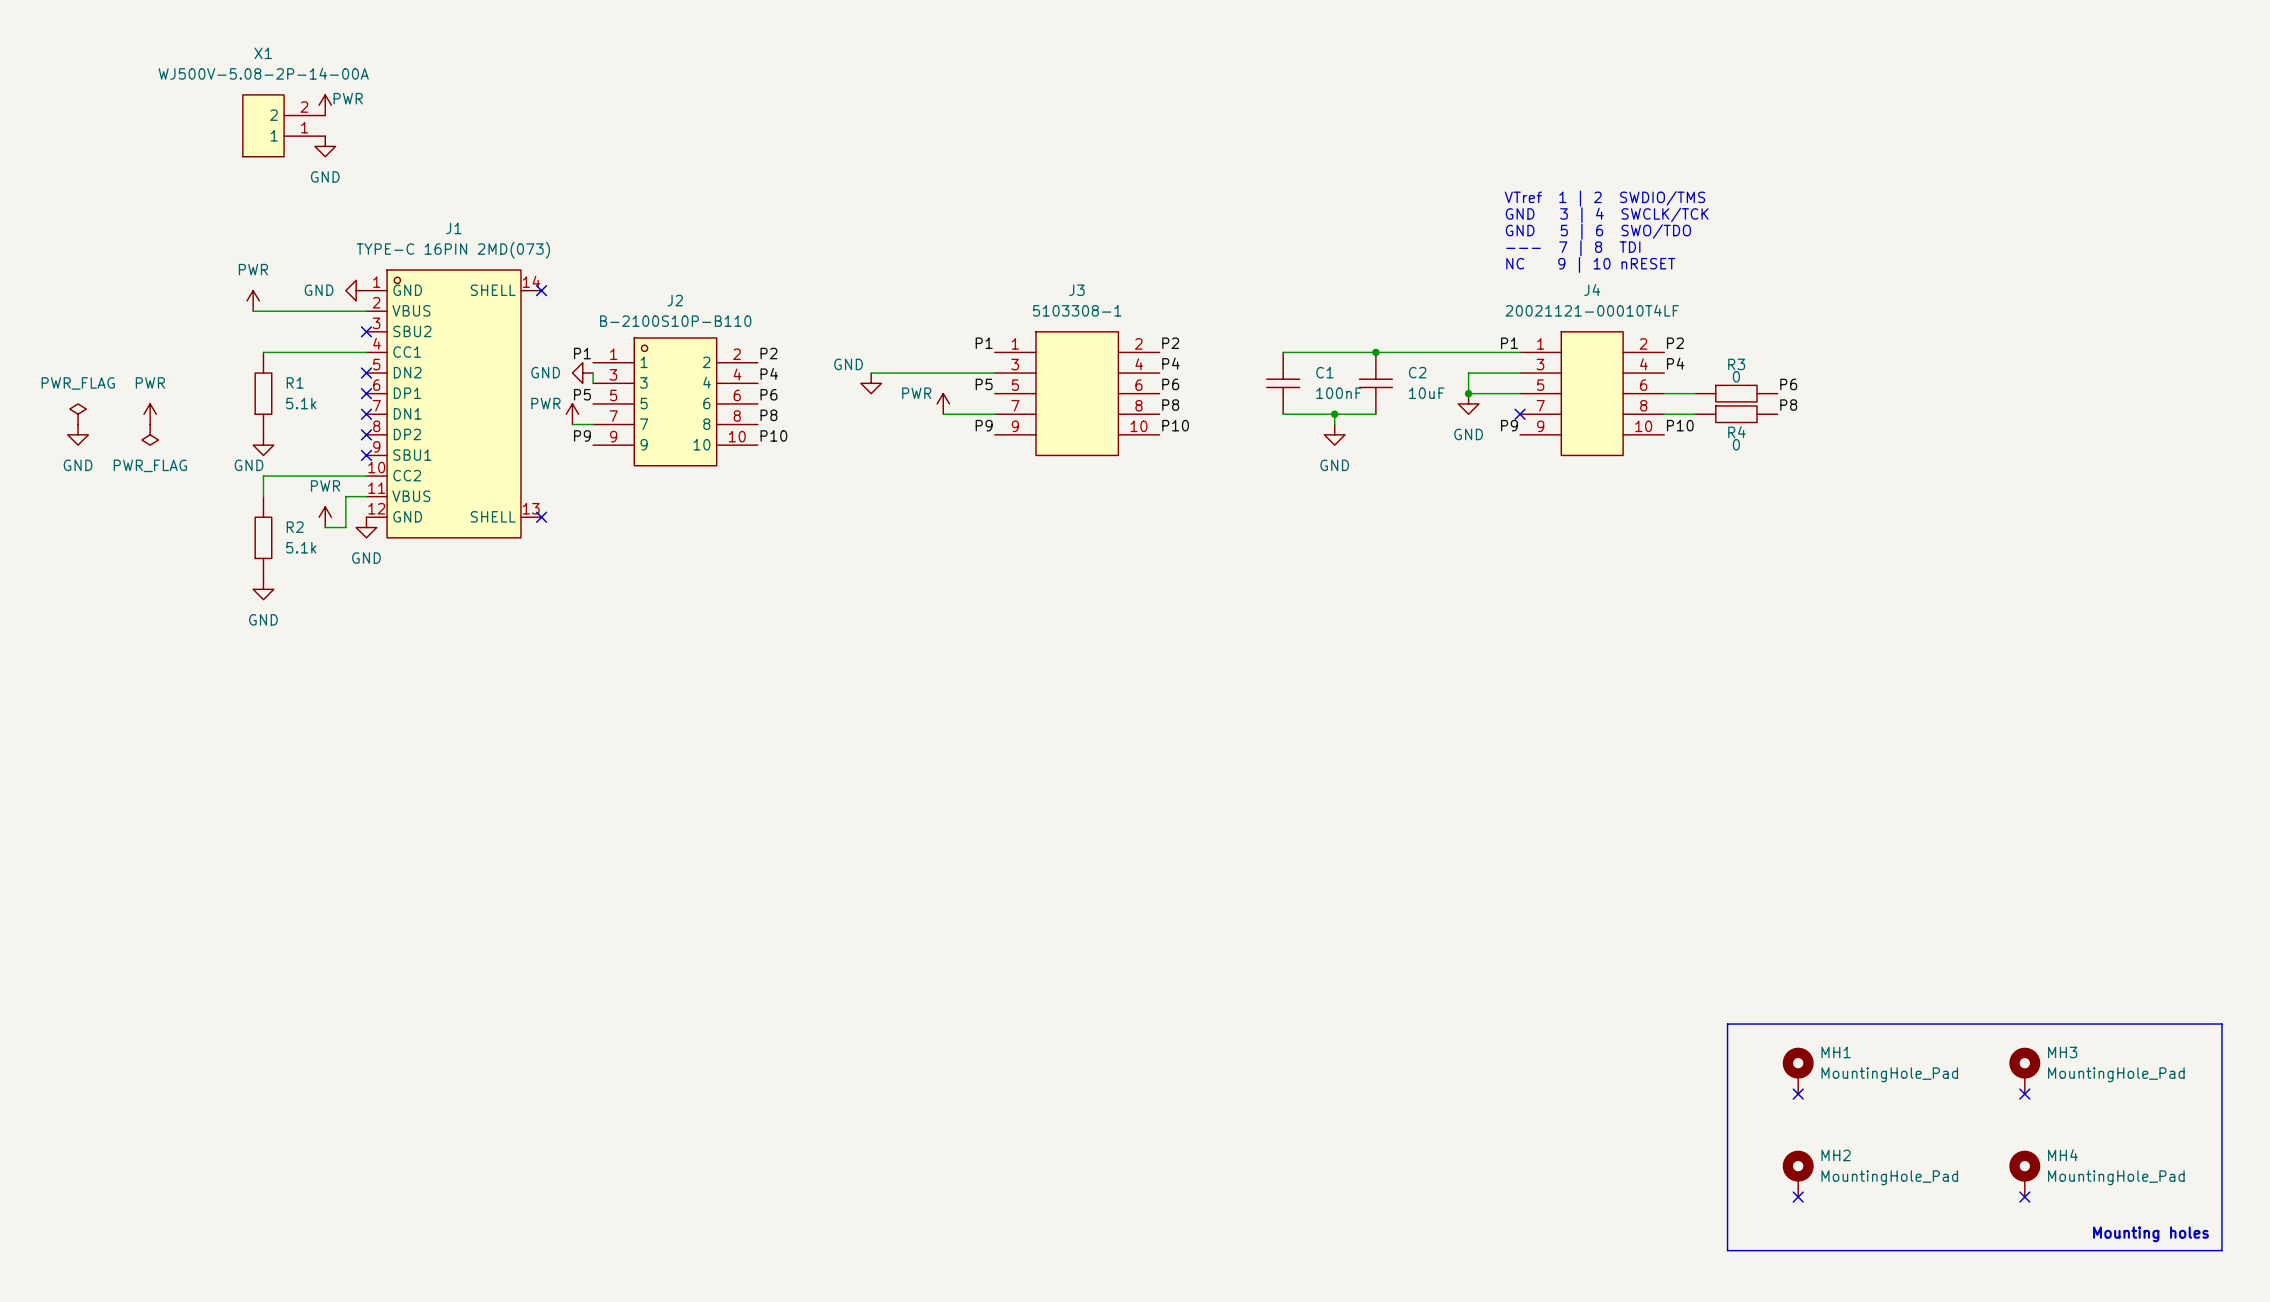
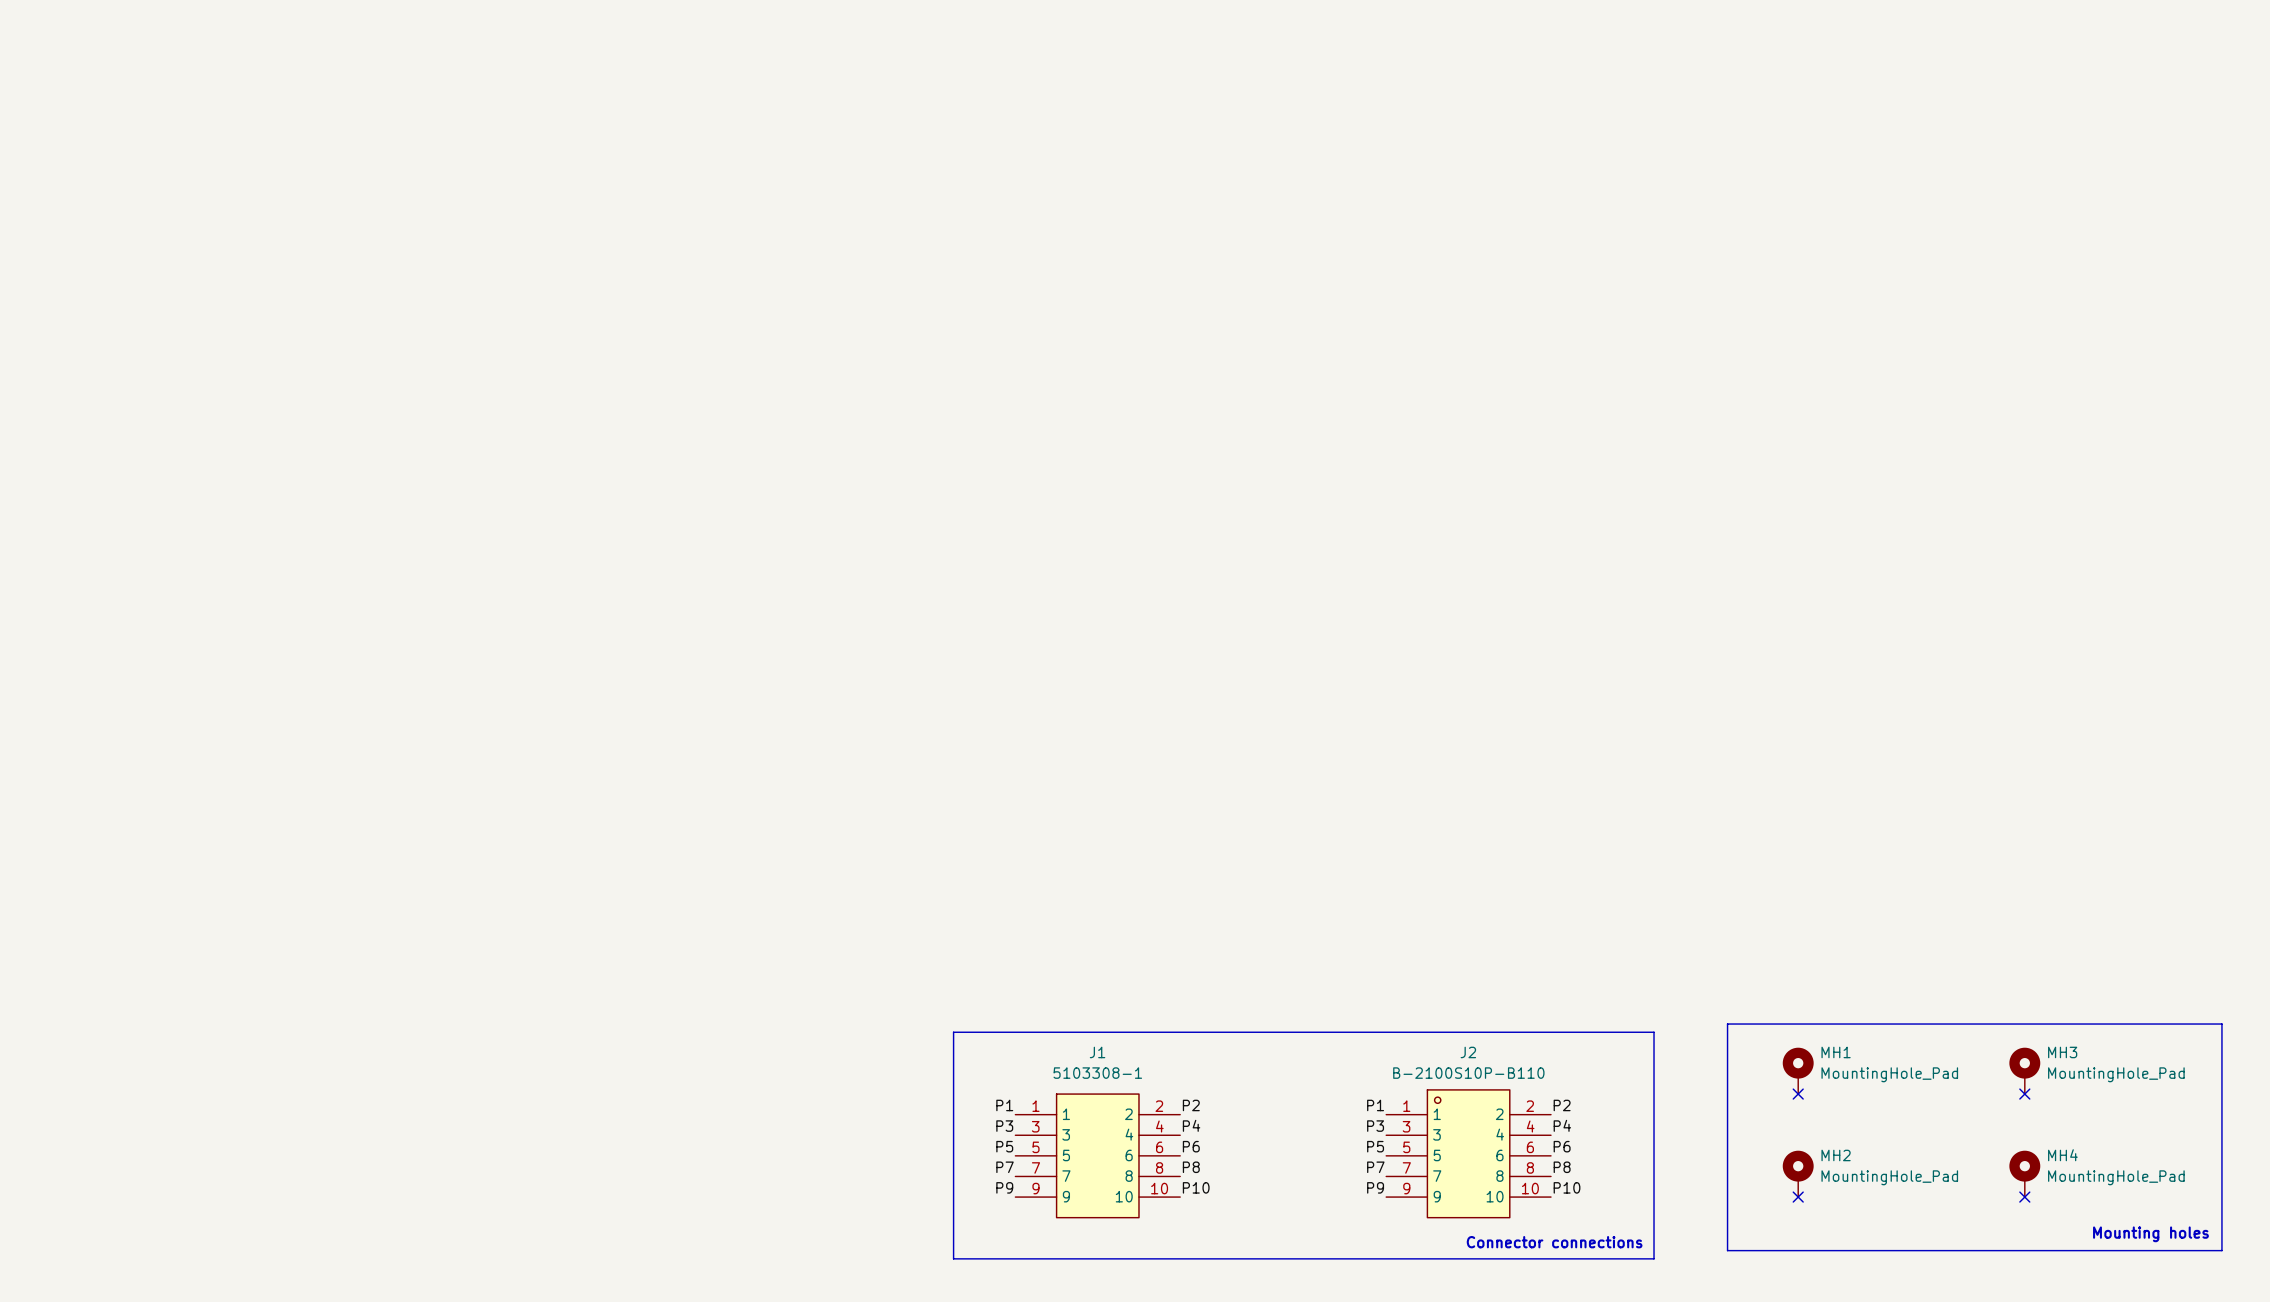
power symbol: PWR (325, 105) -> none
X1: WJ500V-5.08-2P-14-00A (284, 125) -> none
power symbol: GND (325, 146) -> none
text: VTref 1 | 2 SWDIO/TMS (1604, 198) -> none
text: GND 3 | 4 SWCLK/TCK (1607, 215) -> none
J1 name position: J1 (453, 228) -> J1 (1097, 1052)
text: GND 5 | 6 SWO/TDO (1598, 231) -> none
text: --- 7 | 8 TDI (1573, 248) -> none
J1 value: TYPE-C 16PIN 2MD(073) (453, 250) -> 5103308-1 (1097, 1073)
text: NC 9 | 10 nRESET (1590, 264) -> none
J1 symbol: [366, 270, 542, 538] -> [1015, 1094, 1181, 1218]
power symbol: GND (356, 290) -> none
no-connect mark: (541, 290) -> none
power symbol: PWR (253, 300) -> none
wire: (253, 311) (366, 311) -> none
no-connect mark: (366, 331) -> none
label: P1 (984, 343) -> none
label: P2 (1170, 343) -> none
label: P1 (1509, 343) -> none
label: P2 (1675, 343) -> none
wire: (263, 352) (366, 352) -> none
wire: (1283, 352) (1520, 352) -> none
junction: (1375, 352) -> none
label: P1 (582, 353) -> none
label: P2 (768, 353) -> none
label: P4 (1170, 363) -> none
label: P4 (1675, 363) -> none
no-connect mark: (366, 373) -> none
power symbol: GND (582, 373) -> none
wire: (593, 373) (593, 383) -> none
label: P4 (769, 373) -> none
wire: (871, 373) (994, 373) -> none
wire: (1520, 373) (1468, 373) (1468, 393) (1520, 393) -> none
power symbol: GND (871, 383) -> none
C1: (1283, 383) -> none
C2: (1375, 383) -> none
label: P5 (984, 384) -> none
label: P6 (1170, 384) -> none
label: P6 (1788, 384) -> none
R1: (263, 393) -> none
no-connect mark: (366, 393) -> none
J3: 5103308-1 (1077, 393) -> none
junction: (1468, 393) -> none
J4: 20021121-00010T4LF (1592, 393) -> none
wire: (1664, 393) (1695, 393) -> none
R3: (1736, 393) -> none
label: P5 (582, 394) -> none
label: P6 (768, 394) -> none
J2 position: (675, 401) -> (1468, 1153)
power symbol: PWR (943, 403) -> none
power symbol: GND (1468, 403) -> none
label: P8 (1170, 405) -> none
label: P8 (1788, 405) -> none
power symbol: PWR_FLAG (78, 414) -> none
power symbol: PWR (150, 414) -> none
no-connect mark: (366, 414) -> none
power symbol: PWR (572, 414) -> none
wire: (943, 414) (994, 414) -> none
wire: (1283, 414) (1375, 414) -> none
wire: (1334, 414) (1334, 424) -> none
junction: (1334, 414) -> none
no-connect mark: (1520, 414) -> none
wire: (1664, 414) (1695, 414) -> none
R4: (1736, 414) -> none
label: P8 (768, 415) -> none
wire: (572, 424) (593, 424) -> none
label: P9 (984, 425) -> none
label: P10 (1175, 425) -> none
label: P9 (1509, 425) -> none
label: P10 (1680, 425) -> none
power symbol: GND (78, 434) -> none
power symbol: PWR_FLAG (150, 434) -> none
no-connect mark: (366, 434) -> none
power symbol: GND (1334, 434) -> none
label: P9 (582, 435) -> none
label: P10 (773, 435) -> none
power symbol: GND (263, 445) -> none
no-connect mark: (366, 455) -> none
wire: (366, 476) (263, 476) (263, 496) -> none
wire: (366, 496) (345, 496) (345, 527) (325, 527) -> none
power symbol: PWR (325, 517) -> none
no-connect mark: (541, 517) -> none
power symbol: GND (366, 527) -> none
R2: (263, 537) -> none
power symbol: GND (263, 589) -> none
line: none -> (953, 1032) (1654, 1032) (1654, 1258) (953, 1258) (953, 1032)
label: none -> P1 (1004, 1105)
label: none -> P2 (1191, 1105)
label: none -> P1 (1375, 1105)
label: none -> P2 (1562, 1105)
label: none -> P4 (1191, 1125)
label: none -> P4 (1562, 1125)
label: none -> P3 (1004, 1126)
label: none -> P3 (1375, 1126)
label: none -> P5 (1004, 1146)
label: none -> P6 (1191, 1146)
label: none -> P5 (1375, 1146)
label: none -> P6 (1562, 1146)
label: none -> P7 (1005, 1167)
label: none -> P8 (1191, 1167)
label: none -> P7 (1375, 1167)
label: none -> P8 (1562, 1167)
label: none -> P9 (1004, 1187)
label: none -> P10 (1196, 1187)
label: none -> P9 (1375, 1187)
label: none -> P10 (1567, 1187)
text: none -> Connector connections (1554, 1242)

